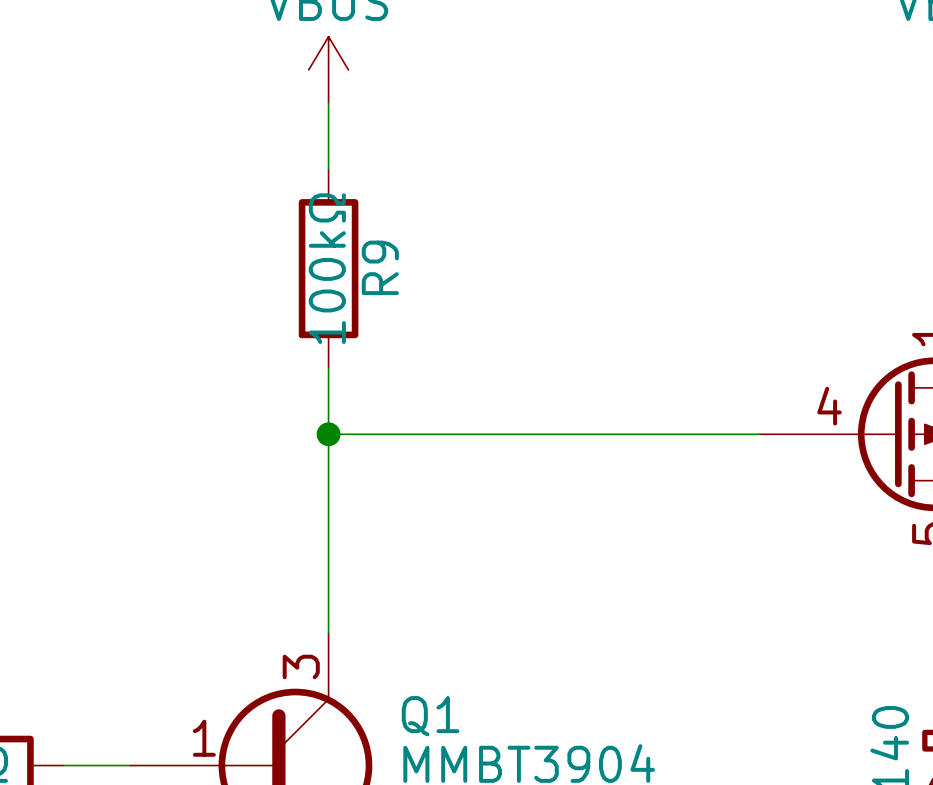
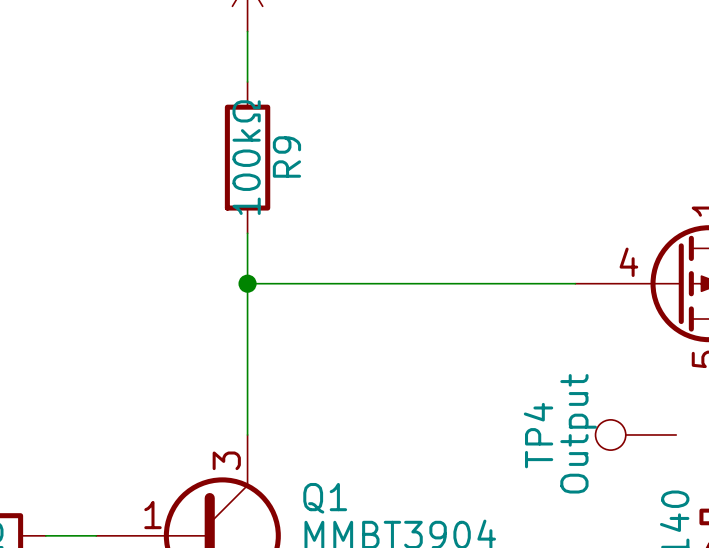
TP4: none -> Output (635, 434)

